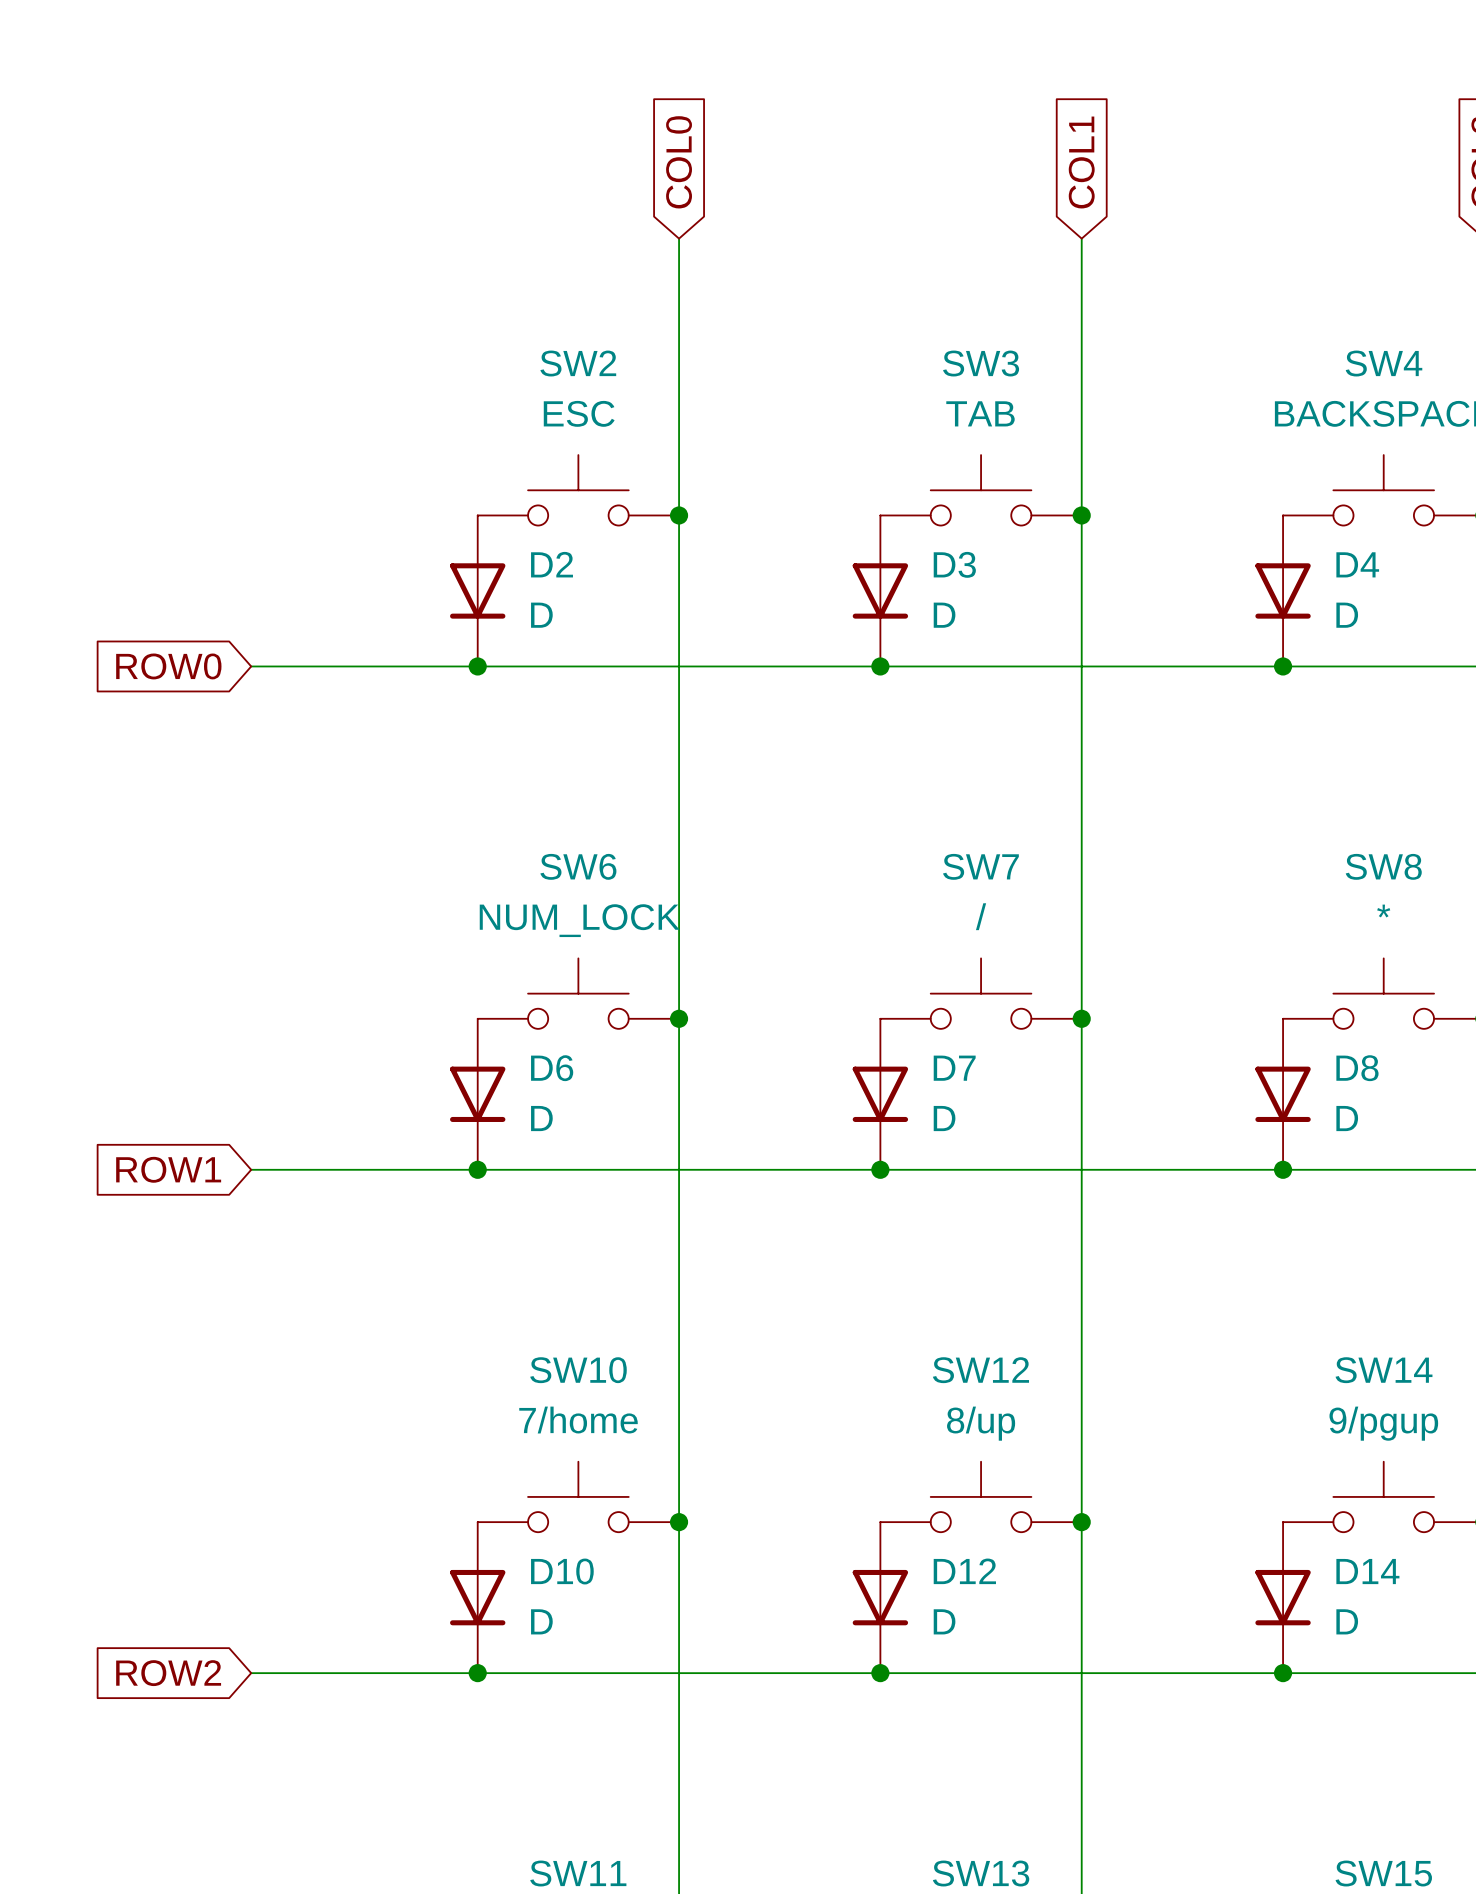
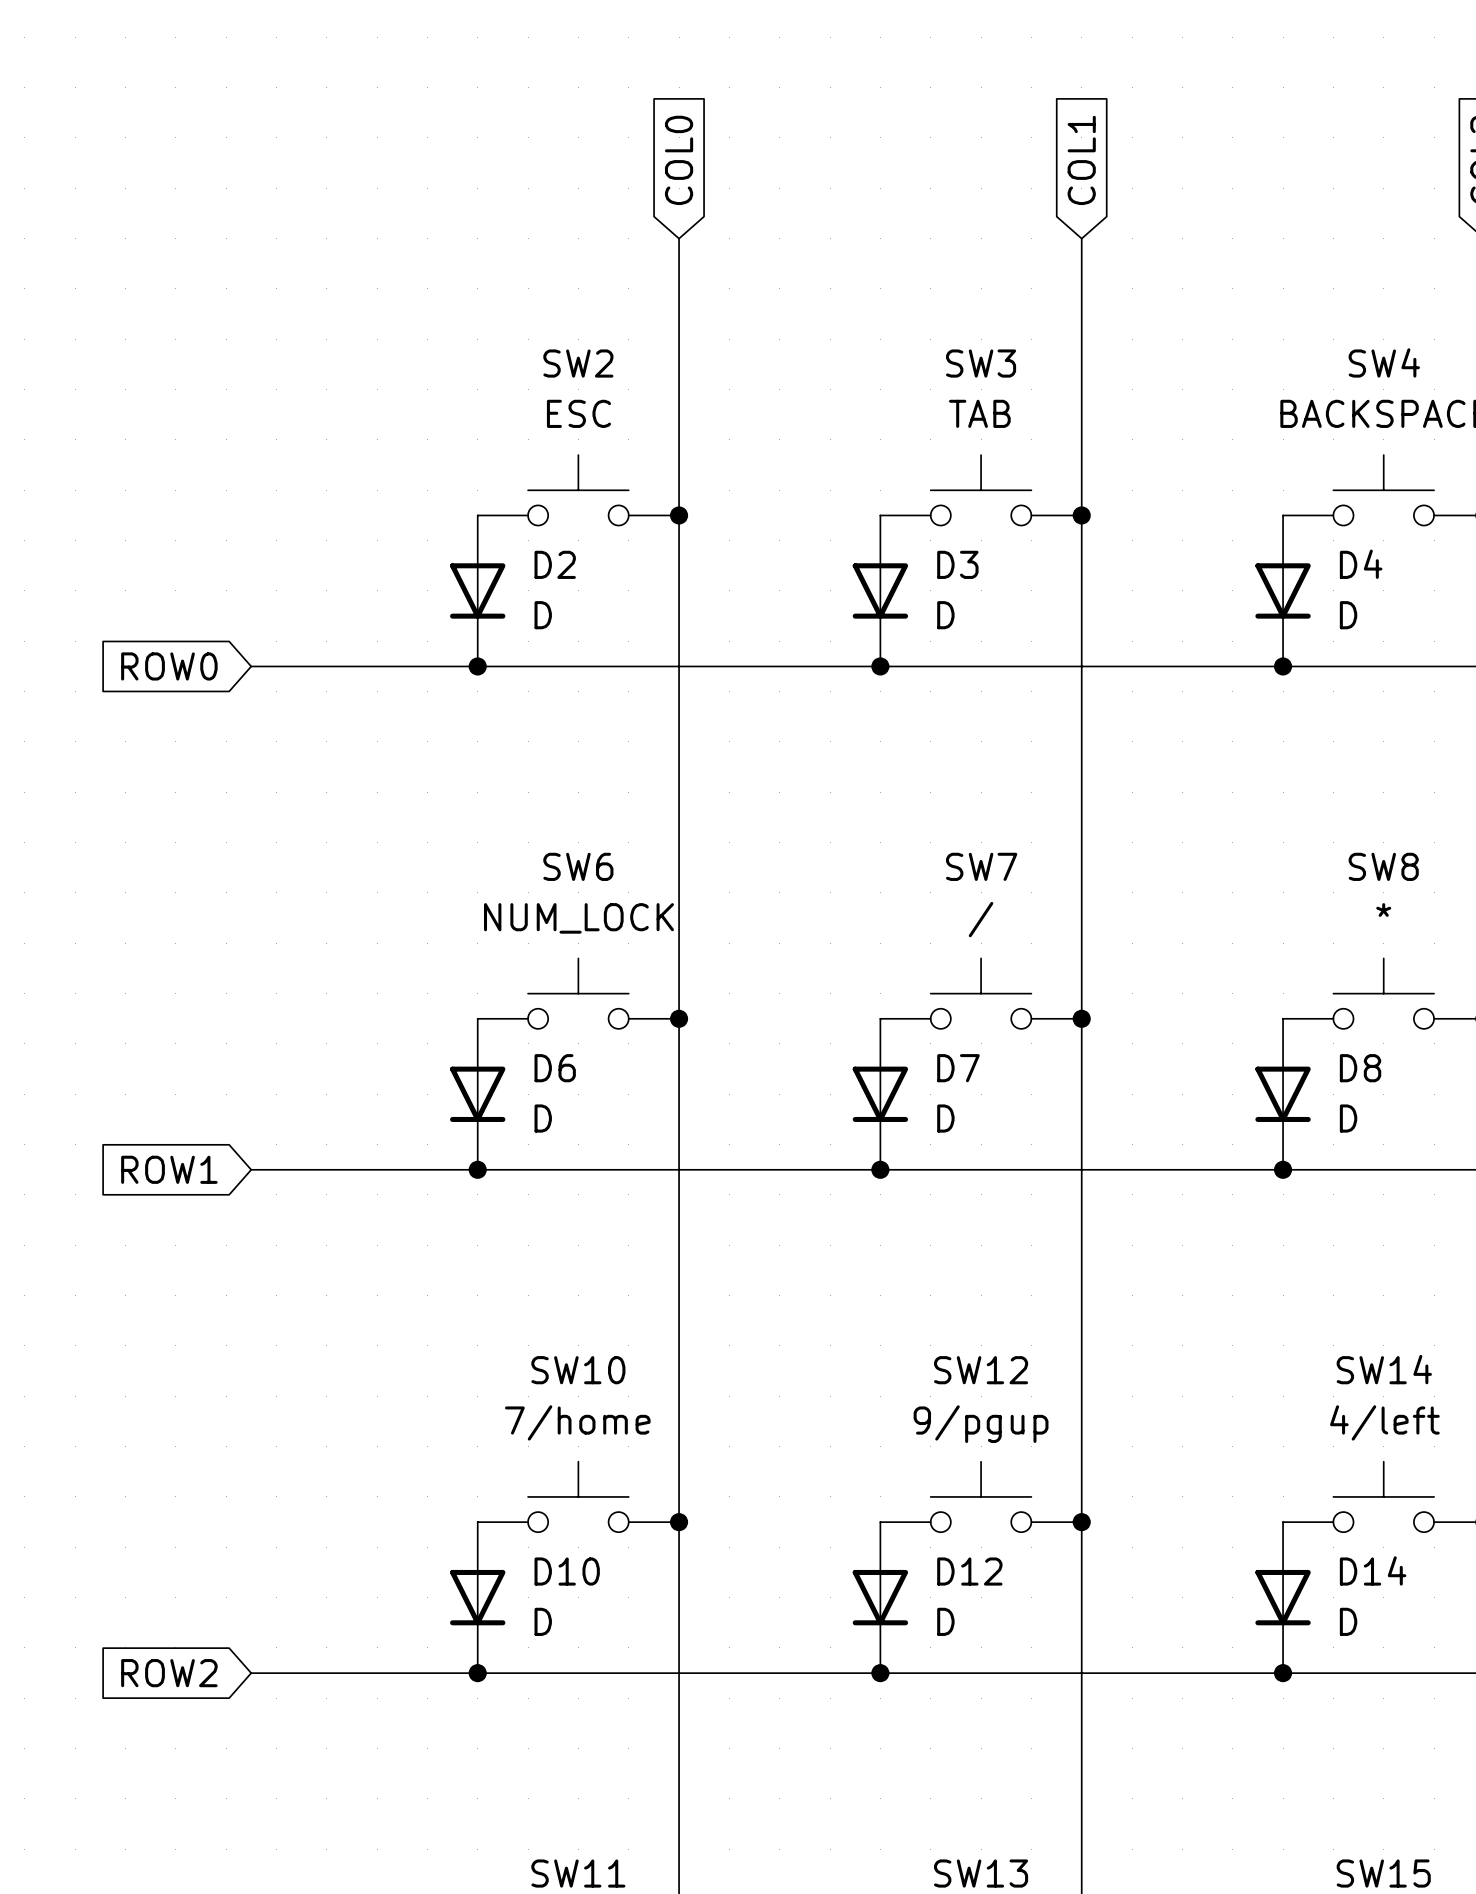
SW12 value: 8/up (981, 1423) -> 9/pgup (981, 1424)
SW14 value: 9/pgup (1383, 1423) -> 4/left (1384, 1422)

